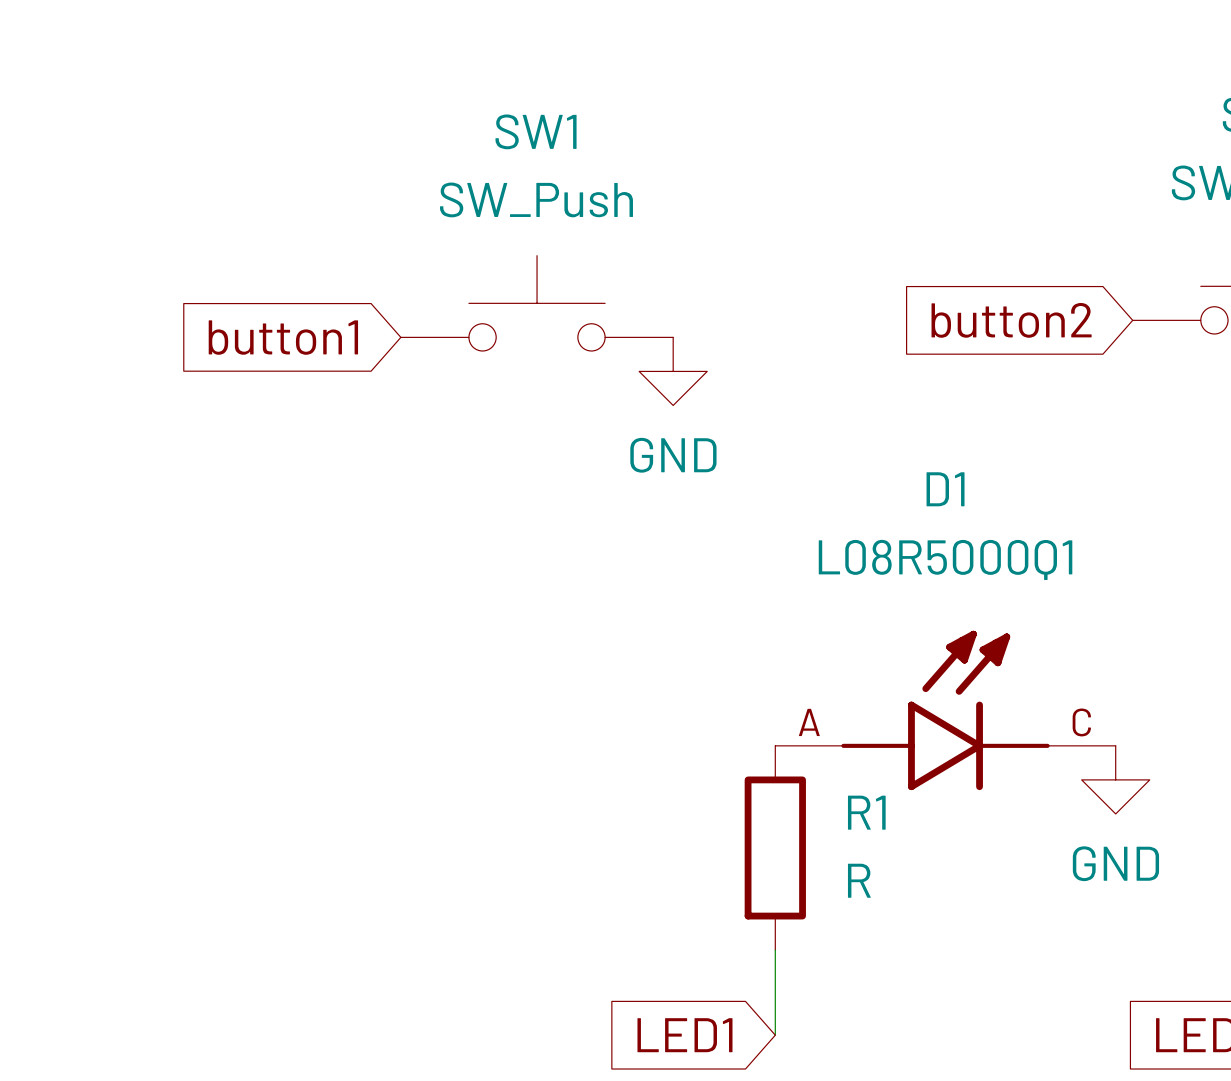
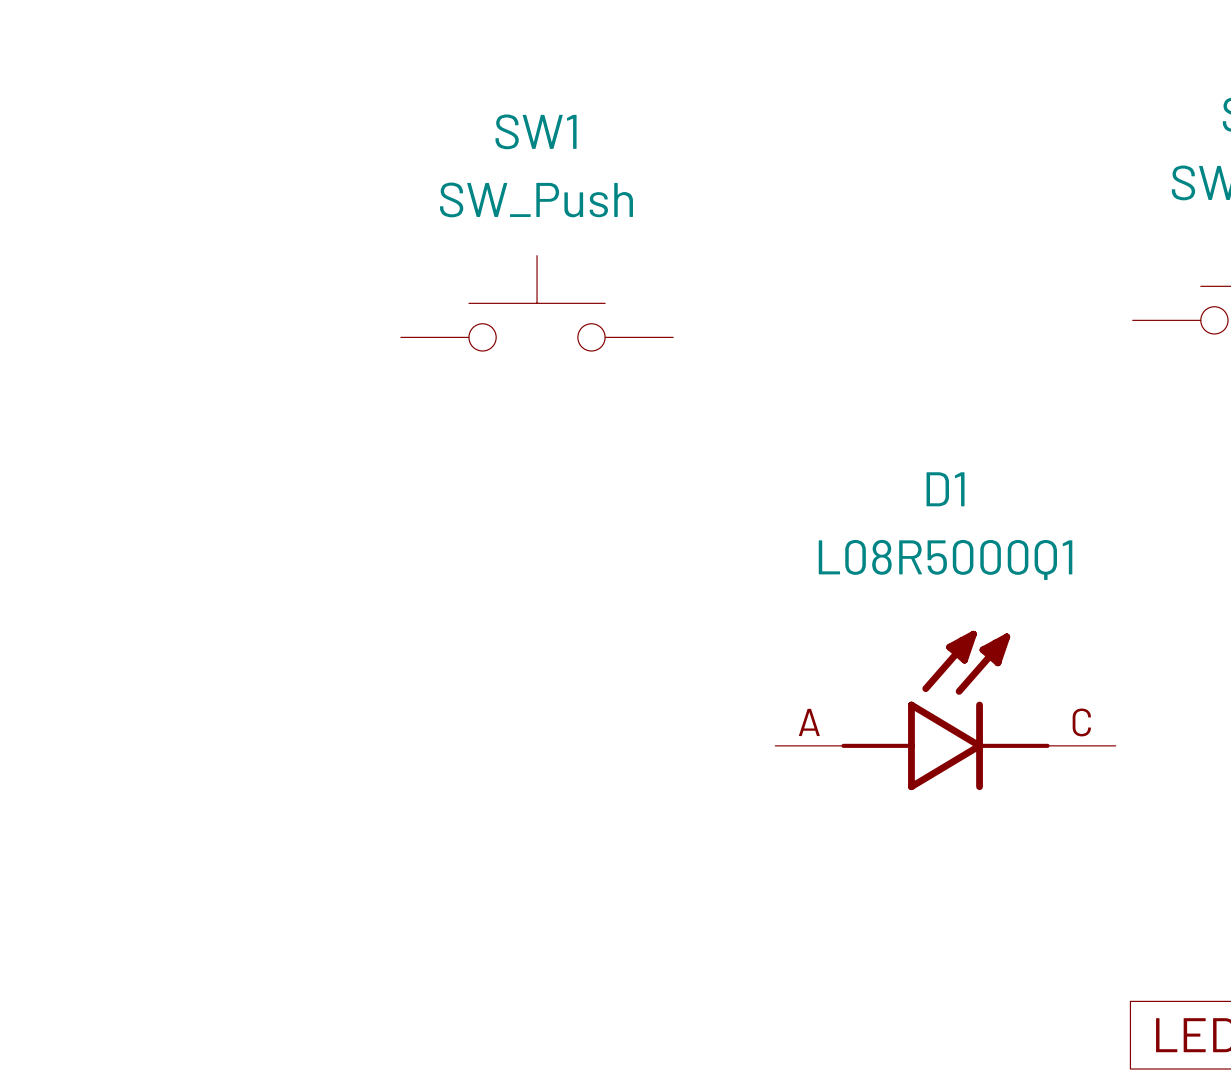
global label: button2 (1011, 320) -> none
global label: button1 (283, 337) -> none
power symbol: GND (673, 371) -> none
power symbol: GND (1115, 779) -> none
R1: R (775, 847) -> none
wire: (775, 950) (775, 1035) -> none
global label: LED1 (684, 1035) -> none

